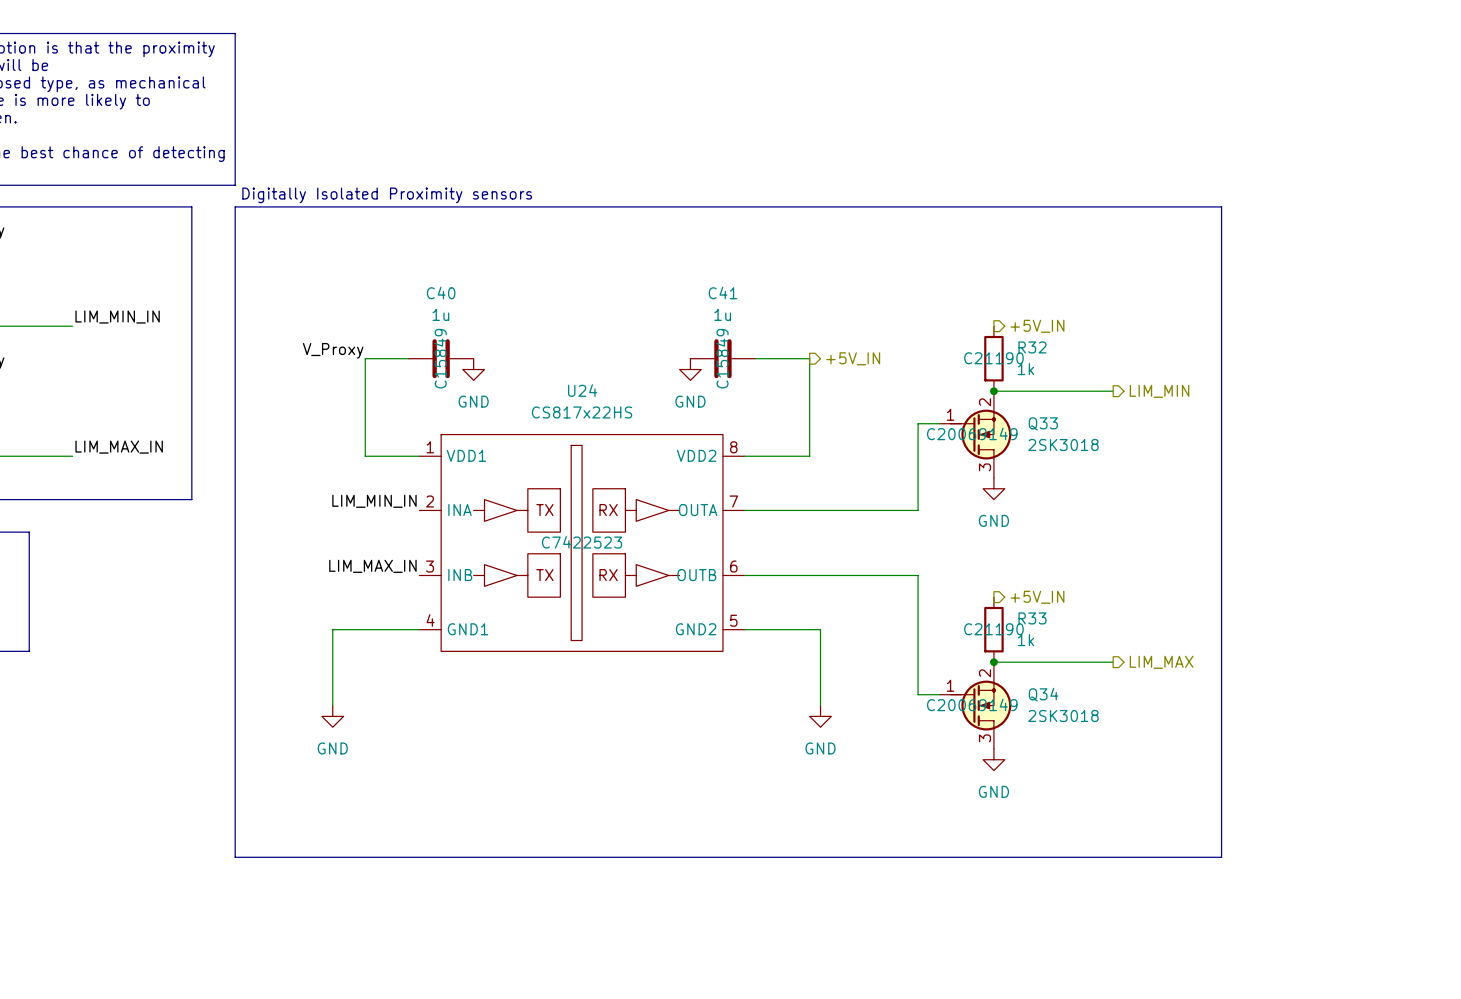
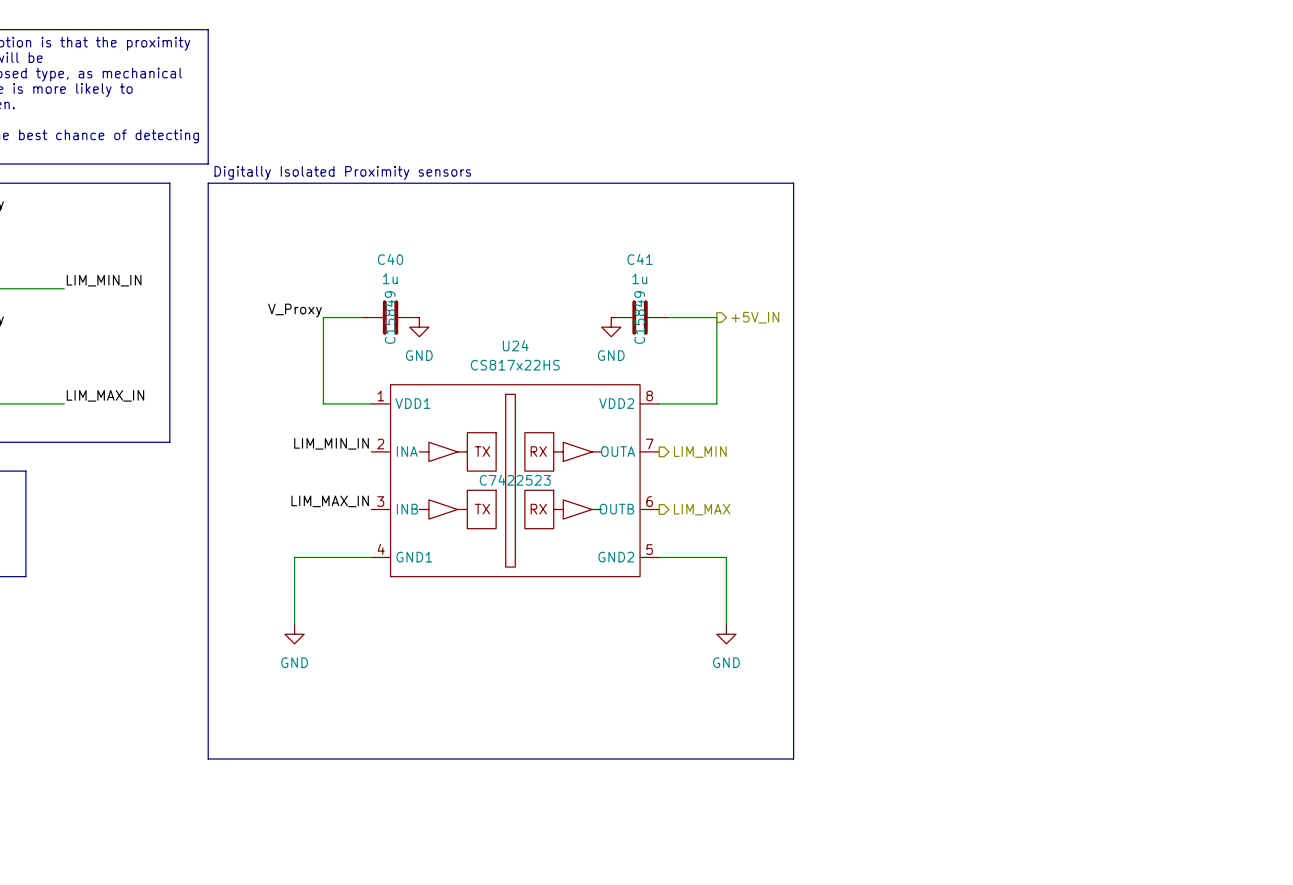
line: (896, 206) (1221, 206) (1221, 857) (896, 857) -> (793, 183) (793, 758)
hierarchical label: +5V_IN (1037, 326) -> none
R32: 1k (993, 358) -> none
wire: (993, 391) (1113, 391) -> none
junction: (993, 391) -> none
hierarchical label: LIM_MIN (1159, 391) -> none
wire: (939, 423) (918, 423) (918, 510) (744, 510) -> none
Q33: 2SK3018 (975, 434) -> none
power symbol: GND (993, 488) -> none
hierarchical label: none -> LIM_MIN (700, 452)
wire: (744, 575) (918, 575) (918, 694) (939, 694) -> none
hierarchical label: none -> LIM_MAX (702, 509)
hierarchical label: +5V_IN (1037, 597) -> none
R33: 1k (993, 629) -> none
wire: (993, 662) (1113, 662) -> none
junction: (993, 662) -> none
hierarchical label: LIM_MAX (1161, 662) -> none
Q34: 2SK3018 (975, 705) -> none
power symbol: GND (993, 759) -> none

